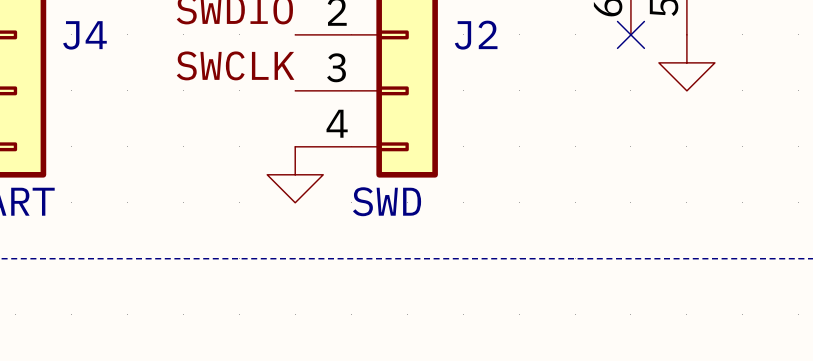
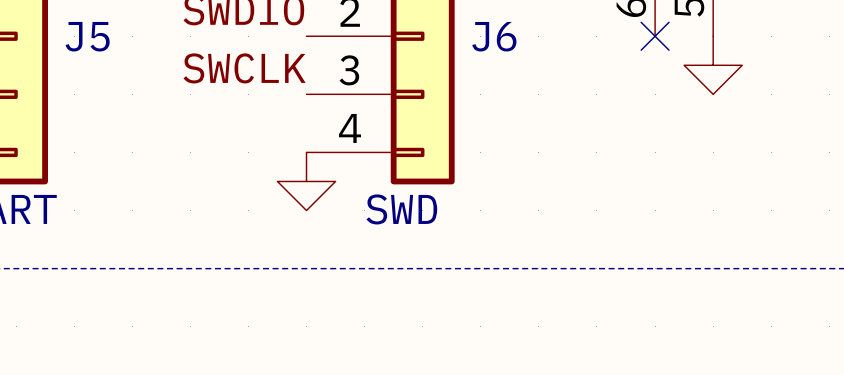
J4 name: J4 (84, 35) -> J5 (87, 36)
J2 name: J2 (476, 35) -> J6 (494, 36)

